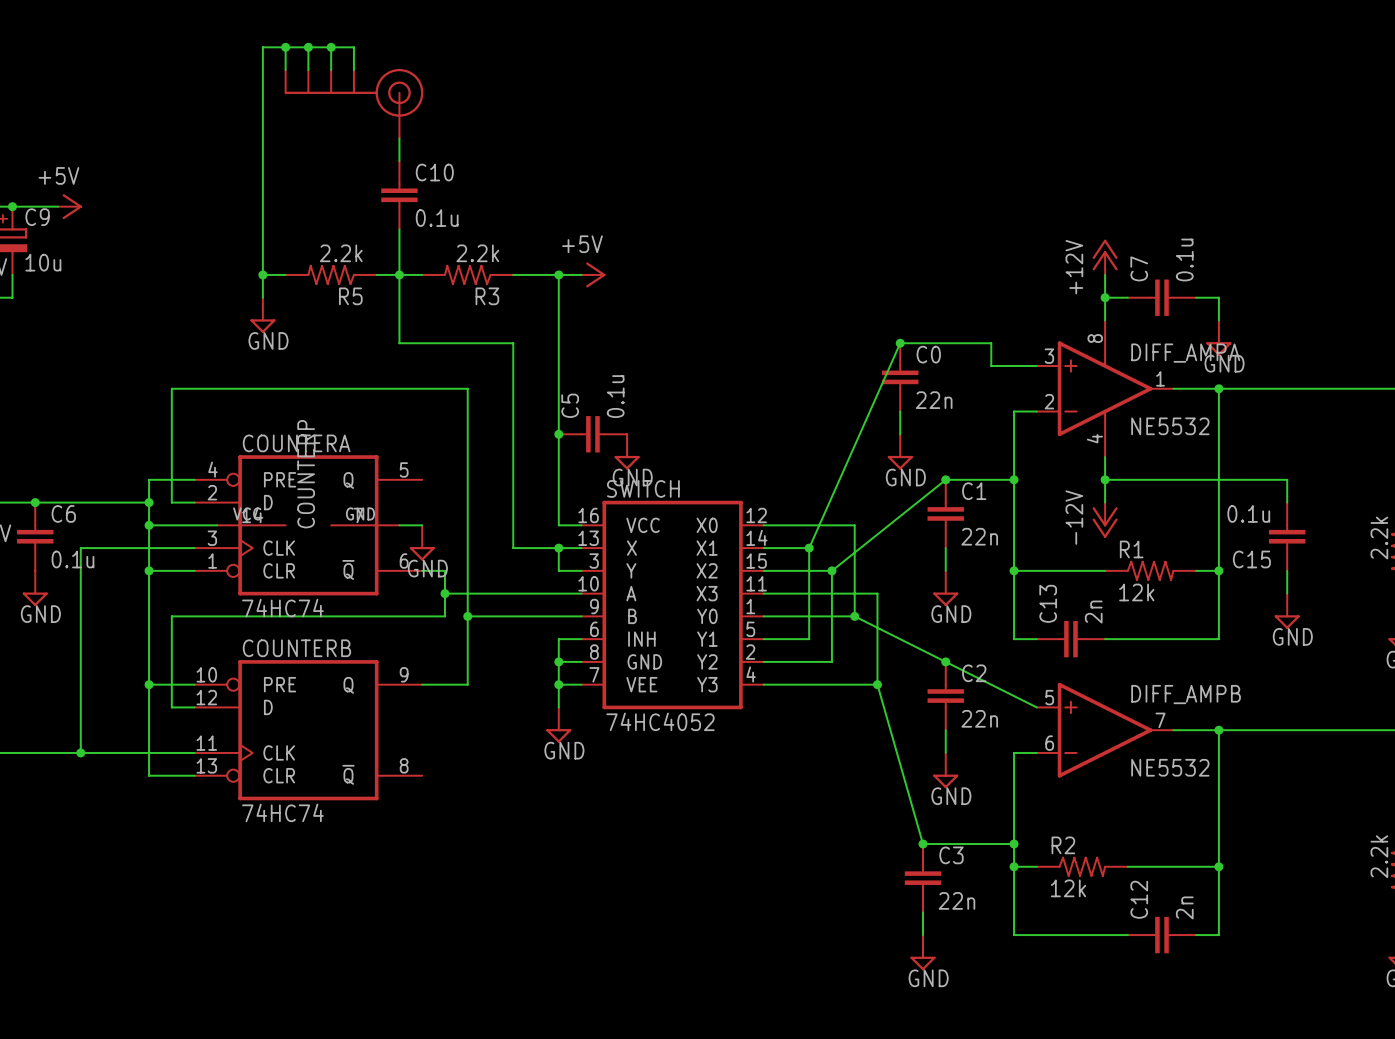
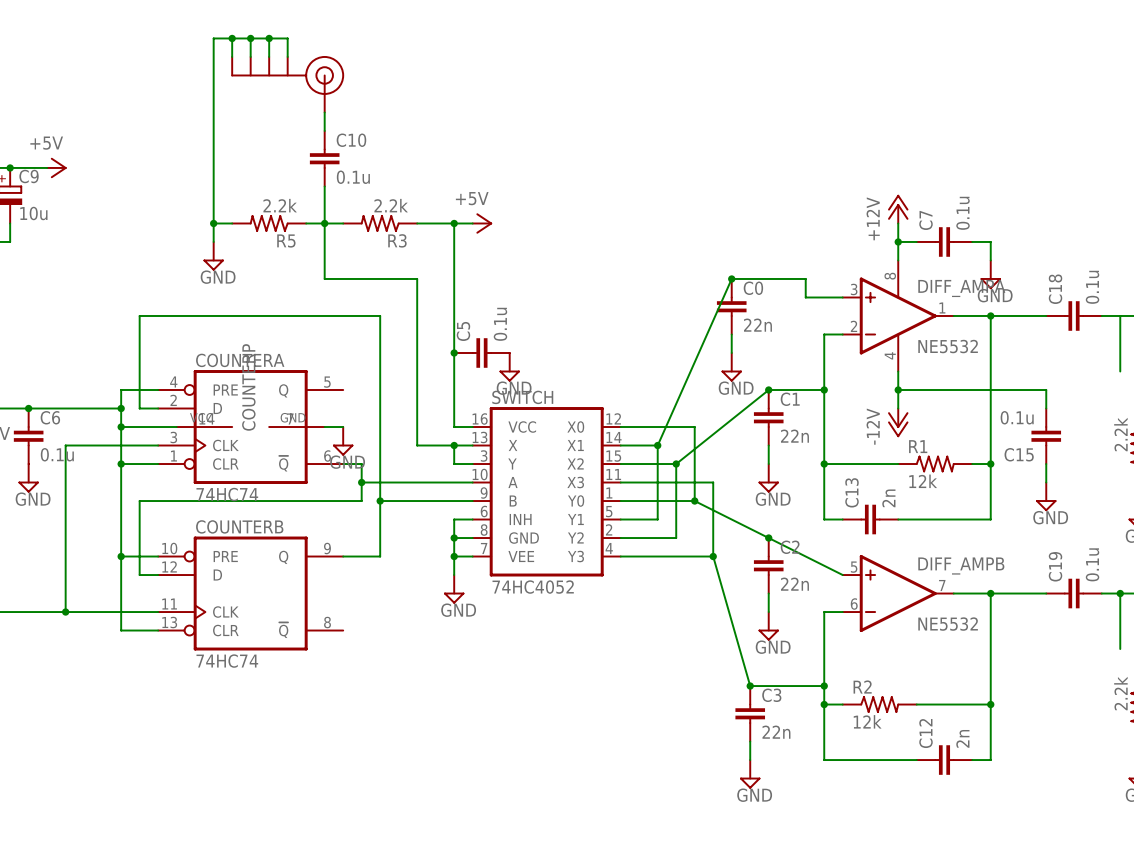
C18: none -> 0.1u (1074, 315)
wire: none -> (1120, 315) (1120, 371)
C19: none -> 0.1u (1074, 593)
wire: none -> (1120, 593) (1120, 649)
junction: none -> (1120, 593)

